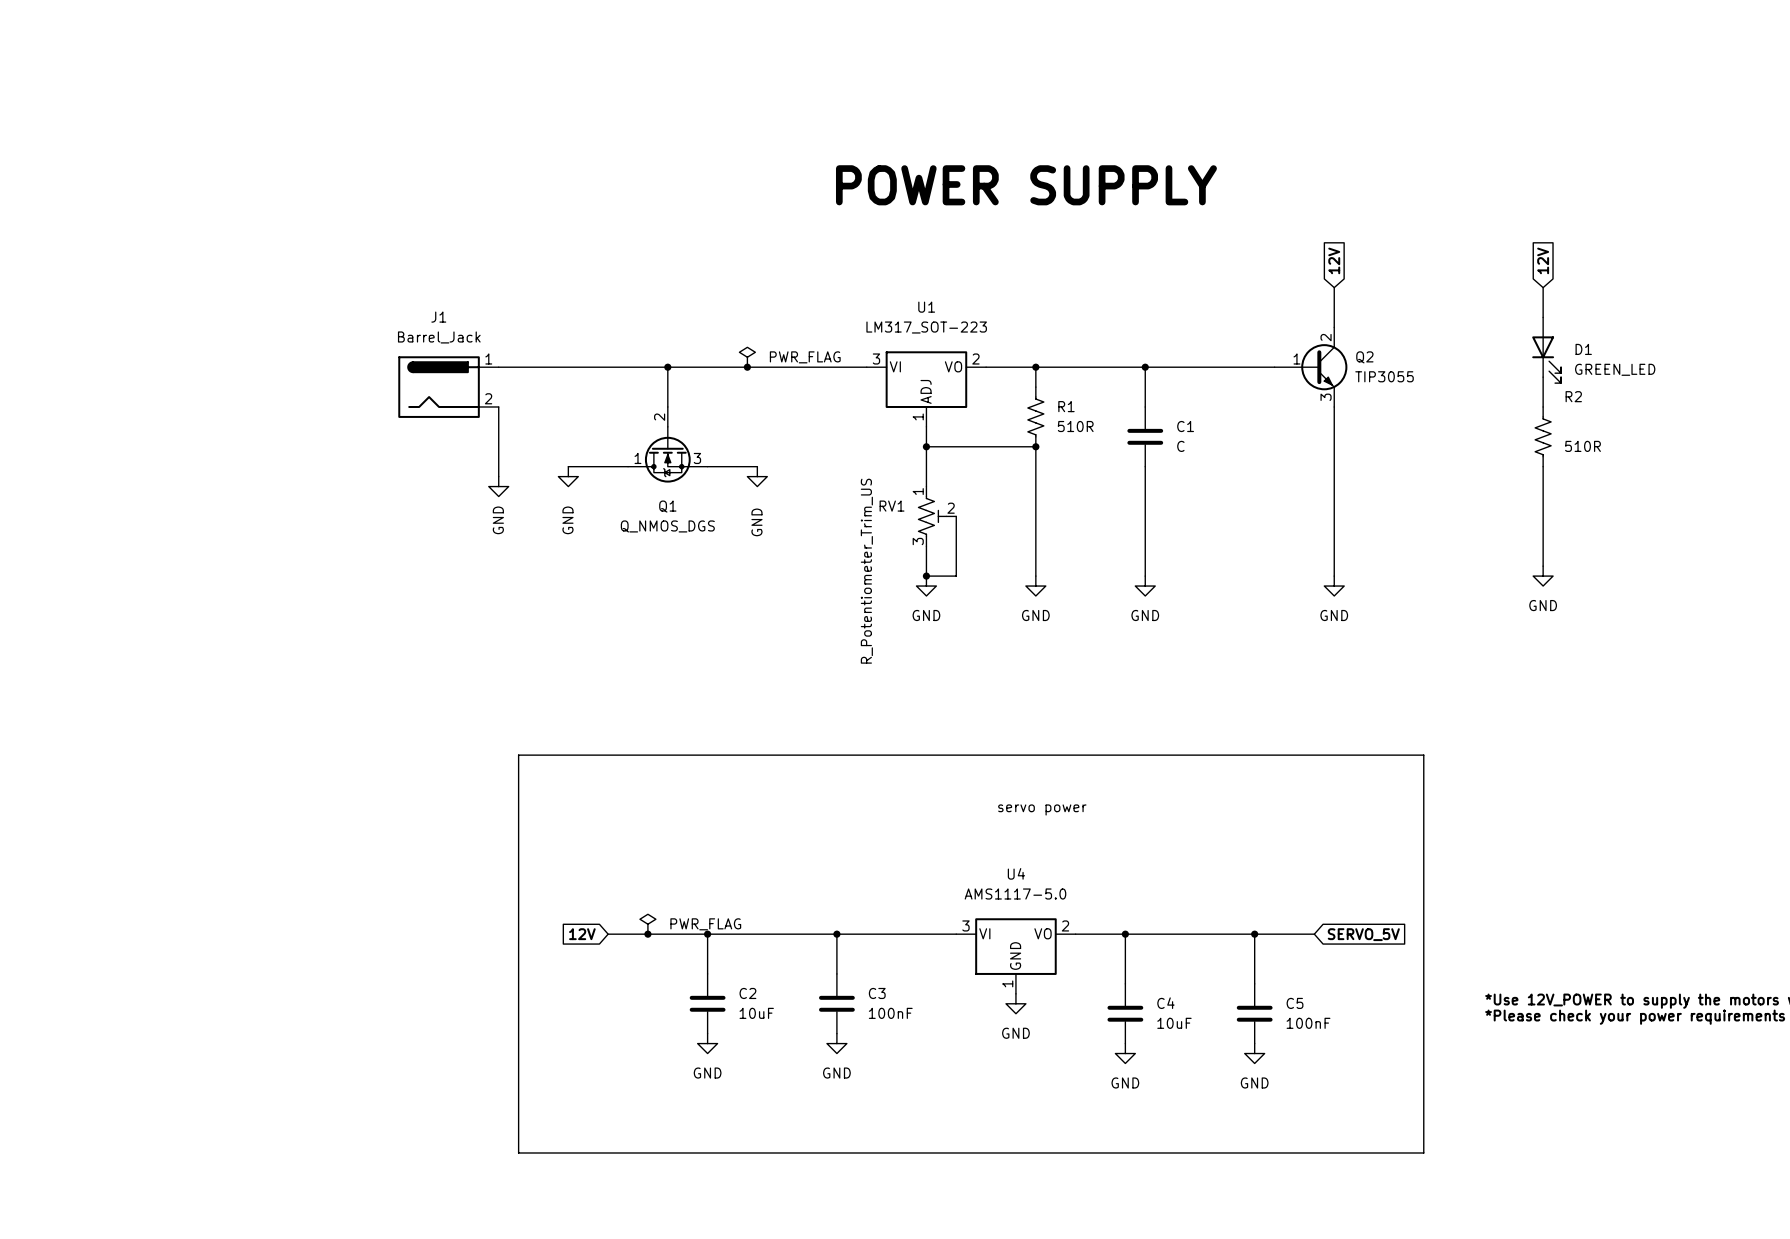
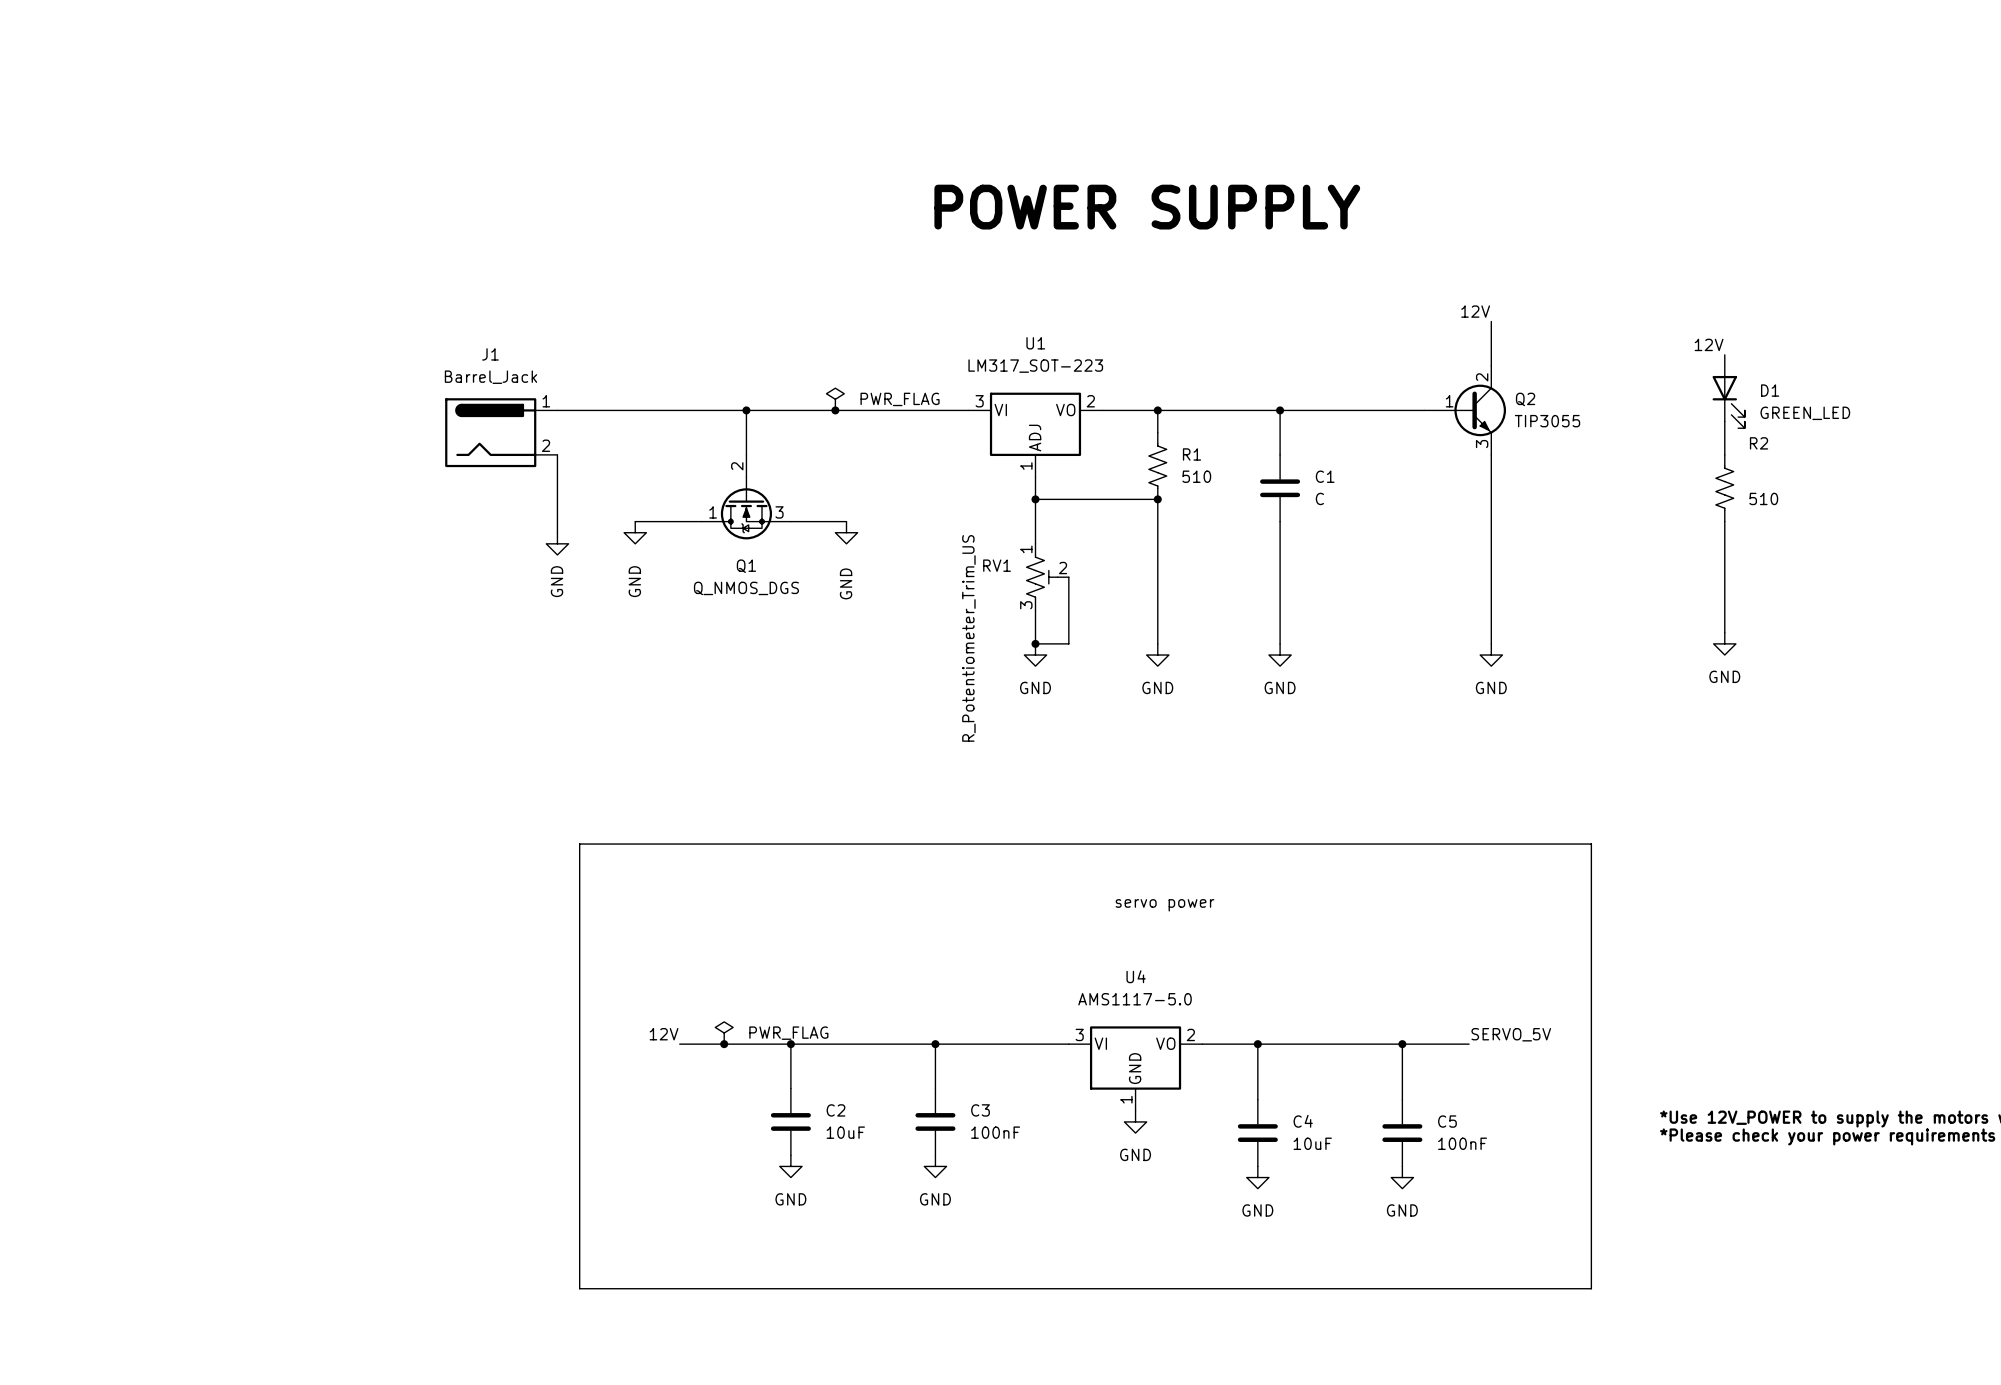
global label: 12V (1334, 260) -> none
global label: 12V (1543, 260) -> none
label: none -> 12V (1475, 311)
wire: (1543, 287) (1543, 317) -> none
label: none -> 12V (1709, 344)
R1 value: 510R (1075, 426) -> 510 (1196, 476)
R2 value: 510R (1582, 446) -> 510 (1763, 498)
label: none -> 12V (664, 1034)
label: none -> SERVO_5V (1511, 1034)
global label: 12V (582, 934) -> none
global label: SERVO_5V (1363, 934) -> none

